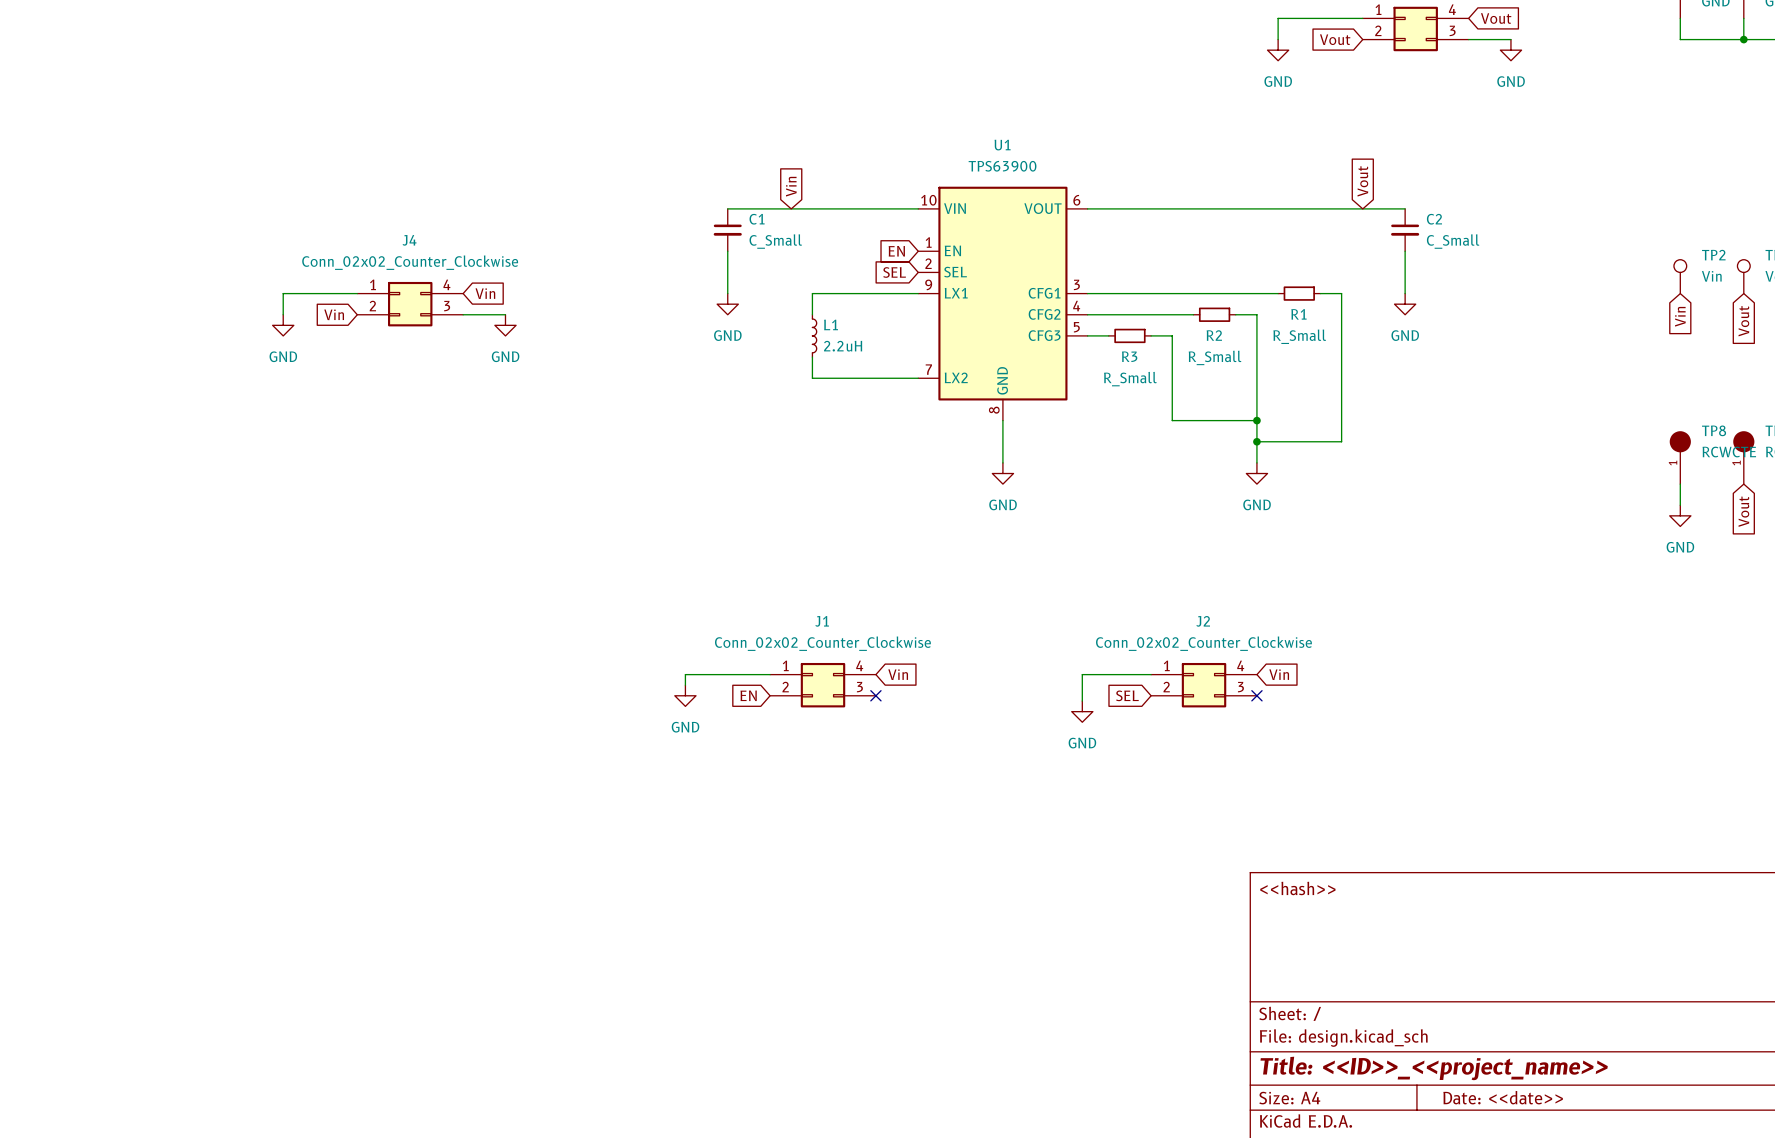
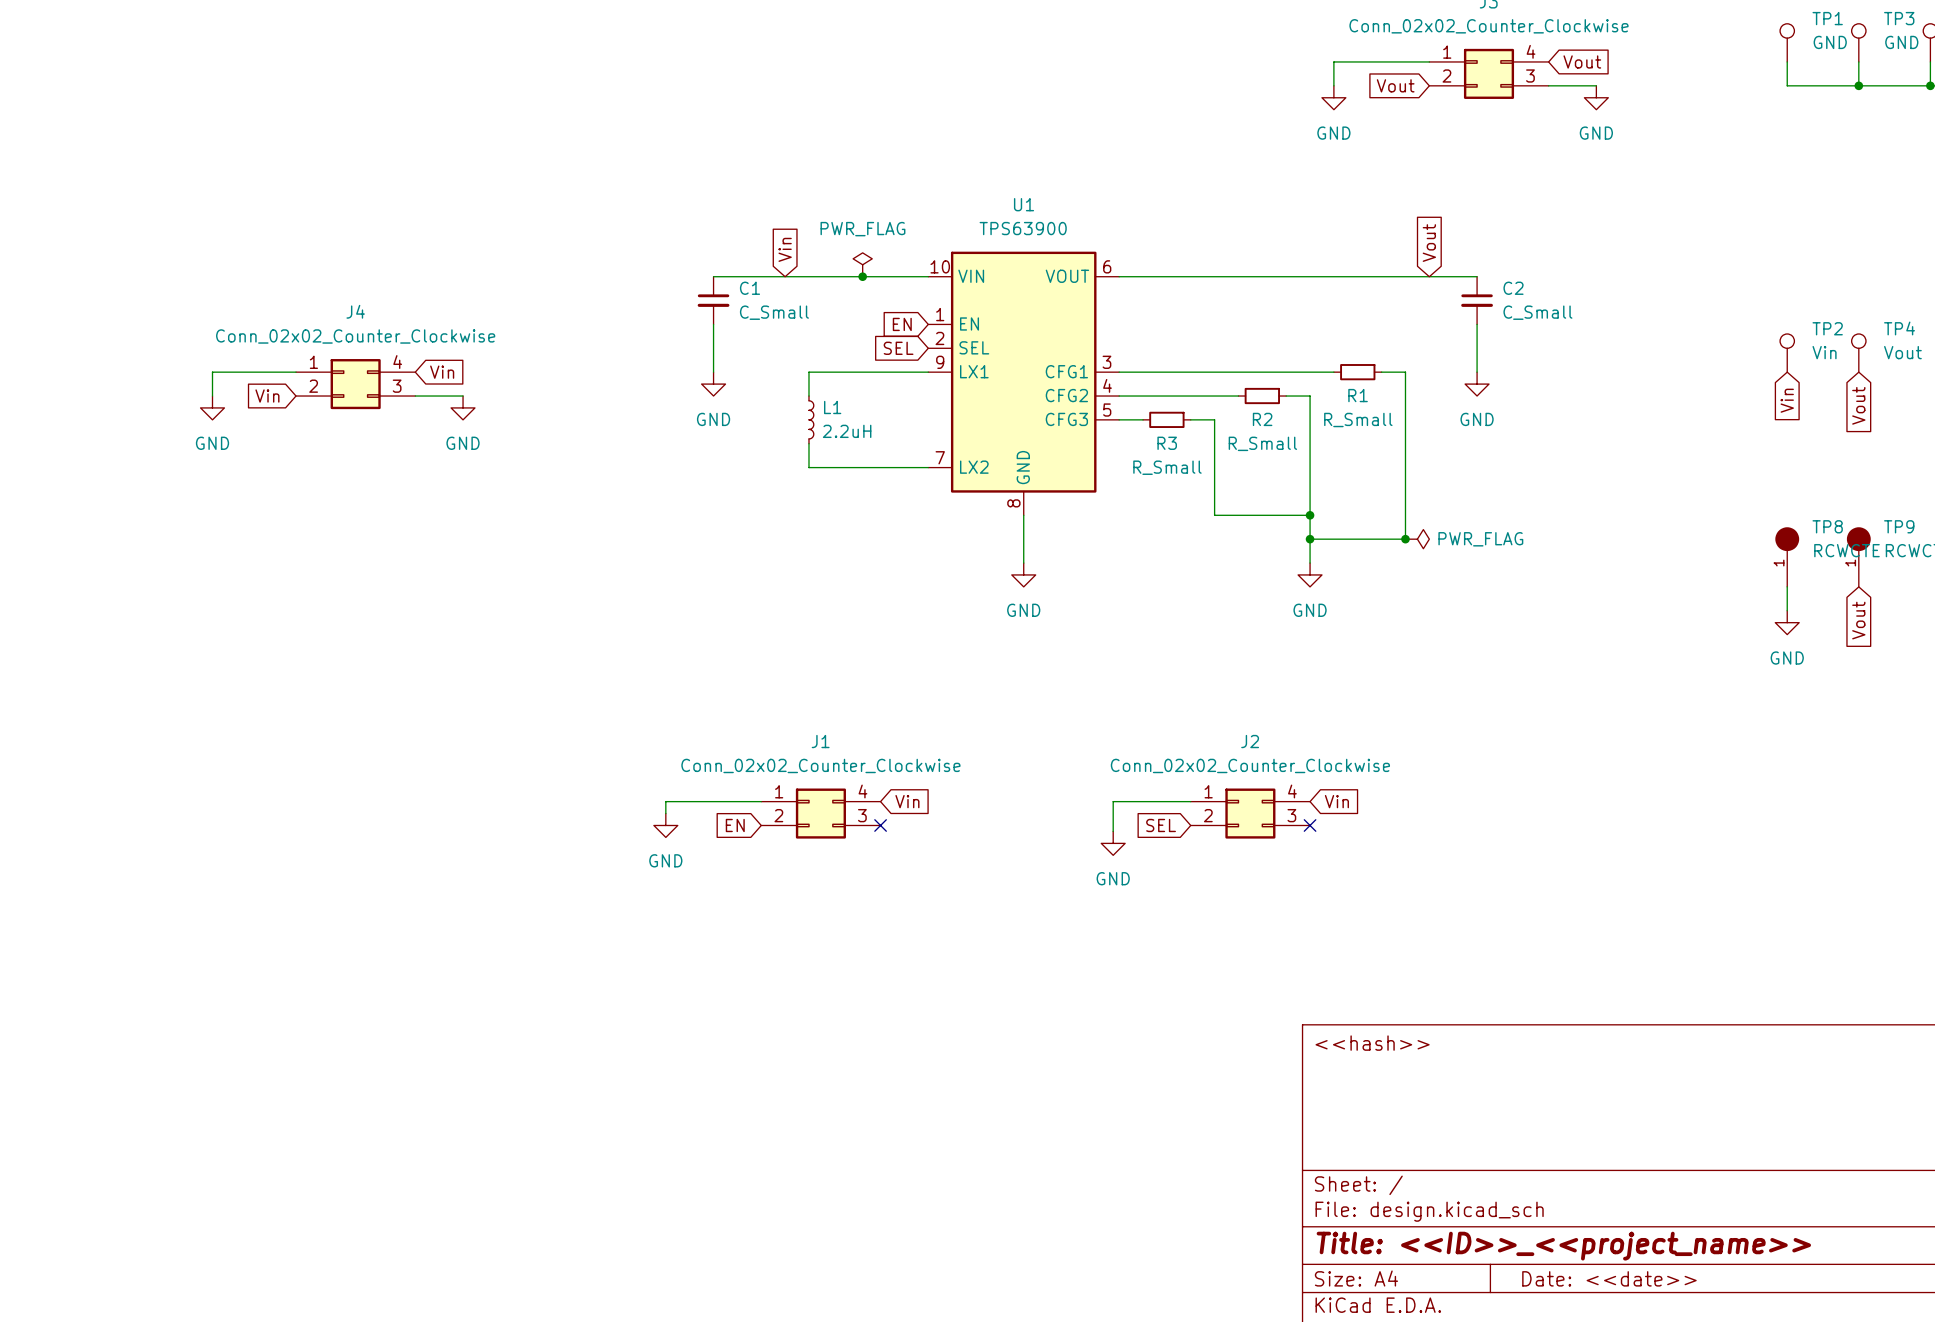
power symbol: none -> PWR_FLAG (862, 264)
junction: none -> (862, 276)
junction: none -> (1405, 539)
power symbol: none -> PWR_FLAG (1417, 539)

